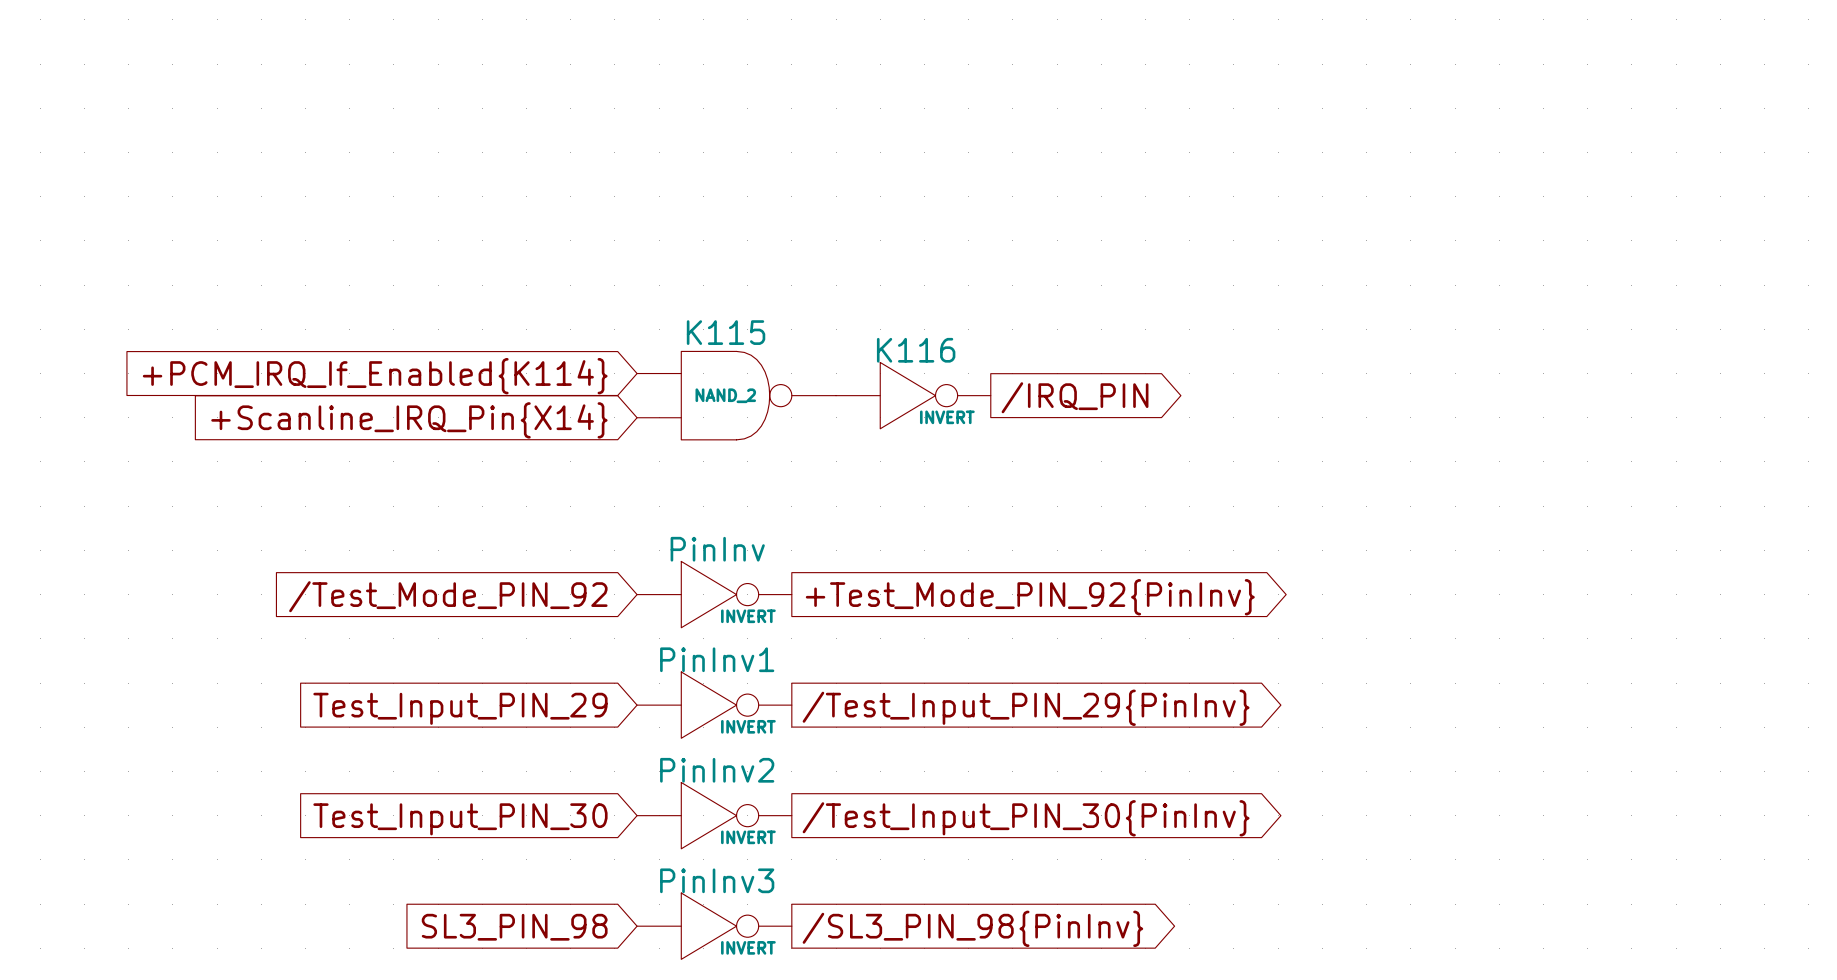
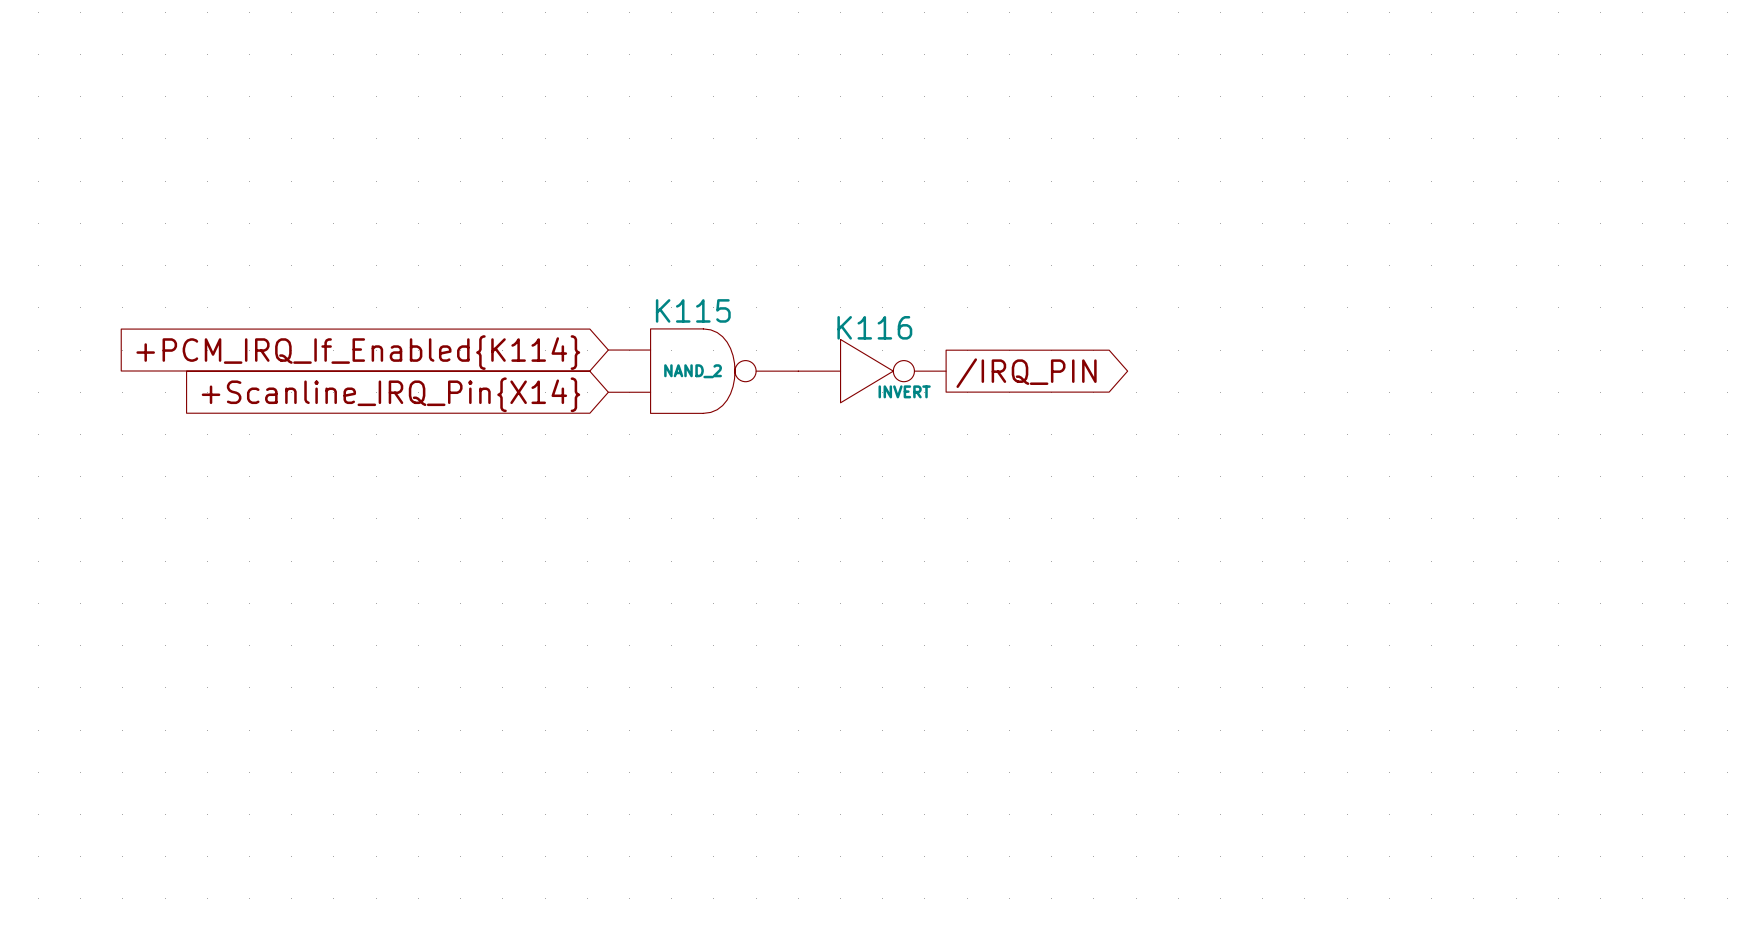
PinInv: INVERT (714, 594) -> none
global label: /Test_Mode_PIN_92 (448, 596) -> none
global label: +Test_Mode_PIN_92{PinInv} (1030, 597) -> none
PinInv1: INVERT (714, 705) -> none
global label: /Test_Input_PIN_29{PinInv} (1026, 707) -> none
global label: Test_Input_PIN_29 (460, 708) -> none
PinInv2: INVERT (714, 815) -> none
global label: /Test_Input_PIN_30{PinInv} (1026, 818) -> none
global label: Test_Input_PIN_30 (460, 819) -> none
PinInv3: INVERT (714, 926) -> none
global label: SL3_PIN_98 (514, 927) -> none
global label: /SL3_PIN_98{PinInv} (972, 928) -> none

